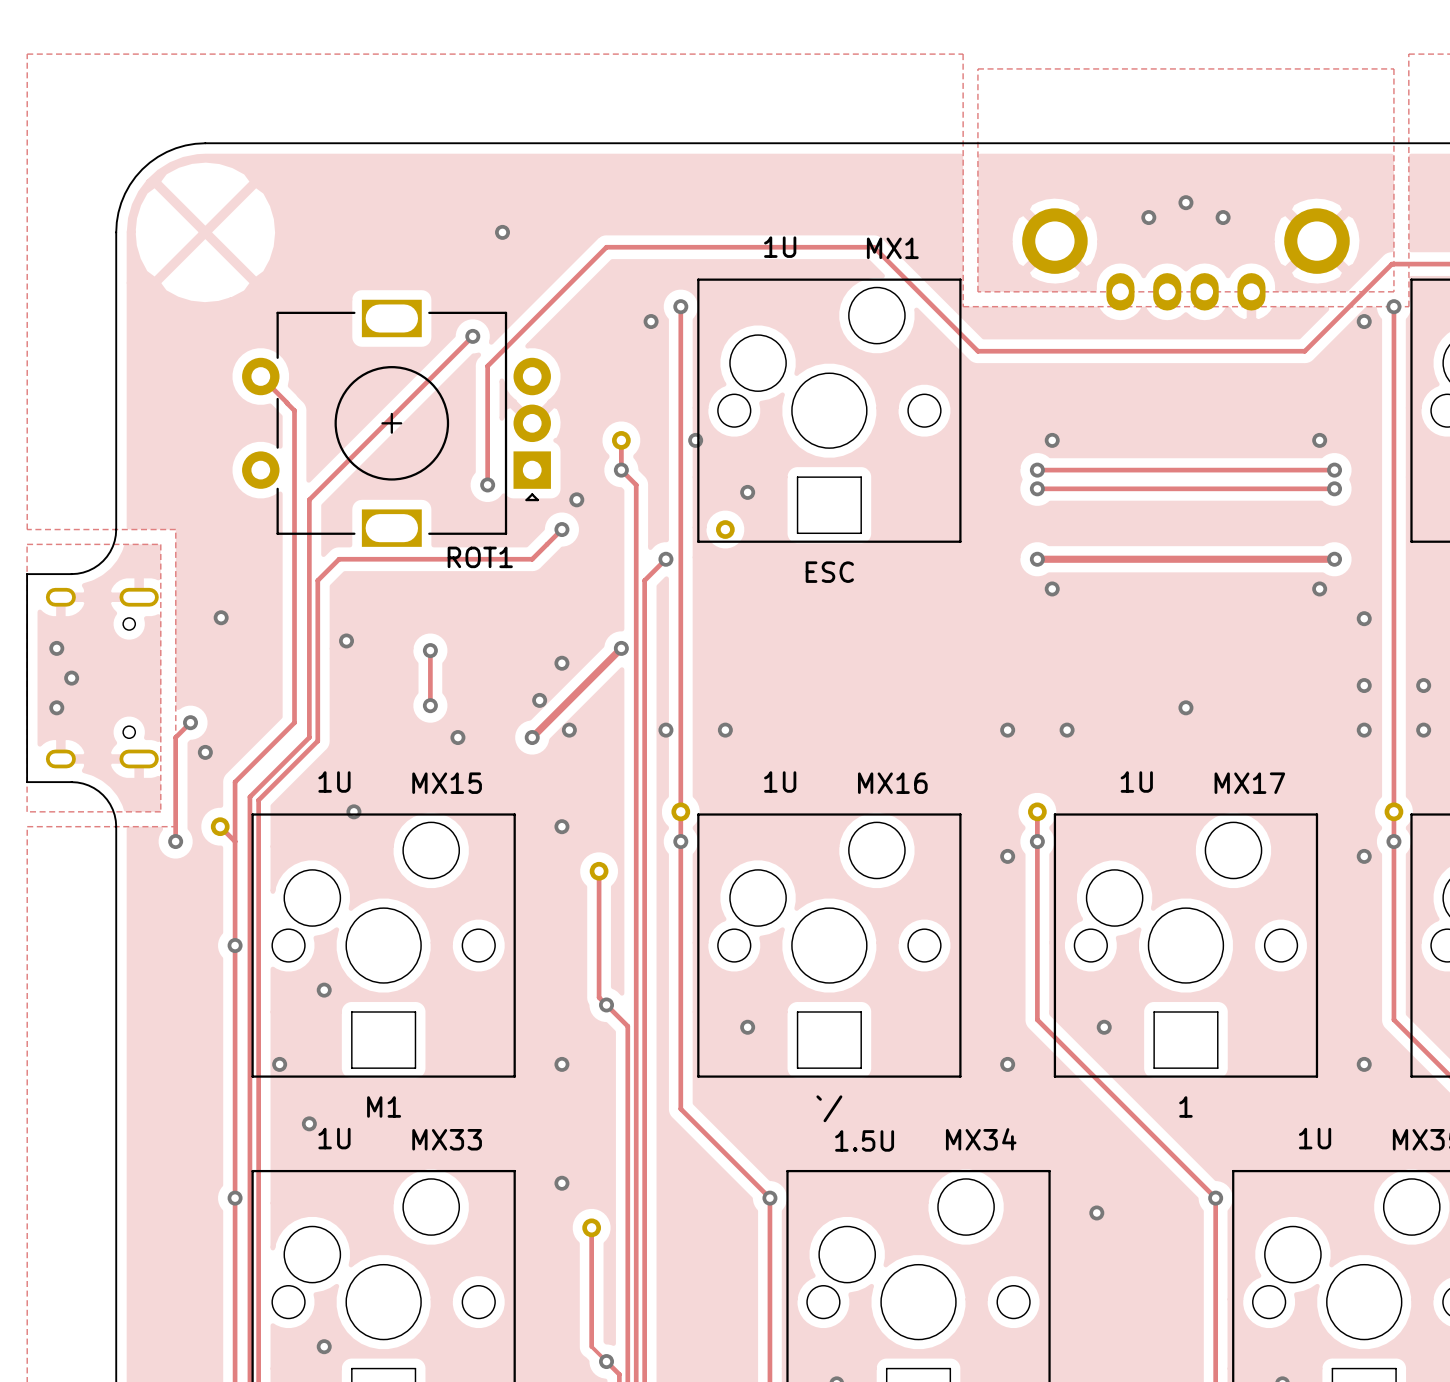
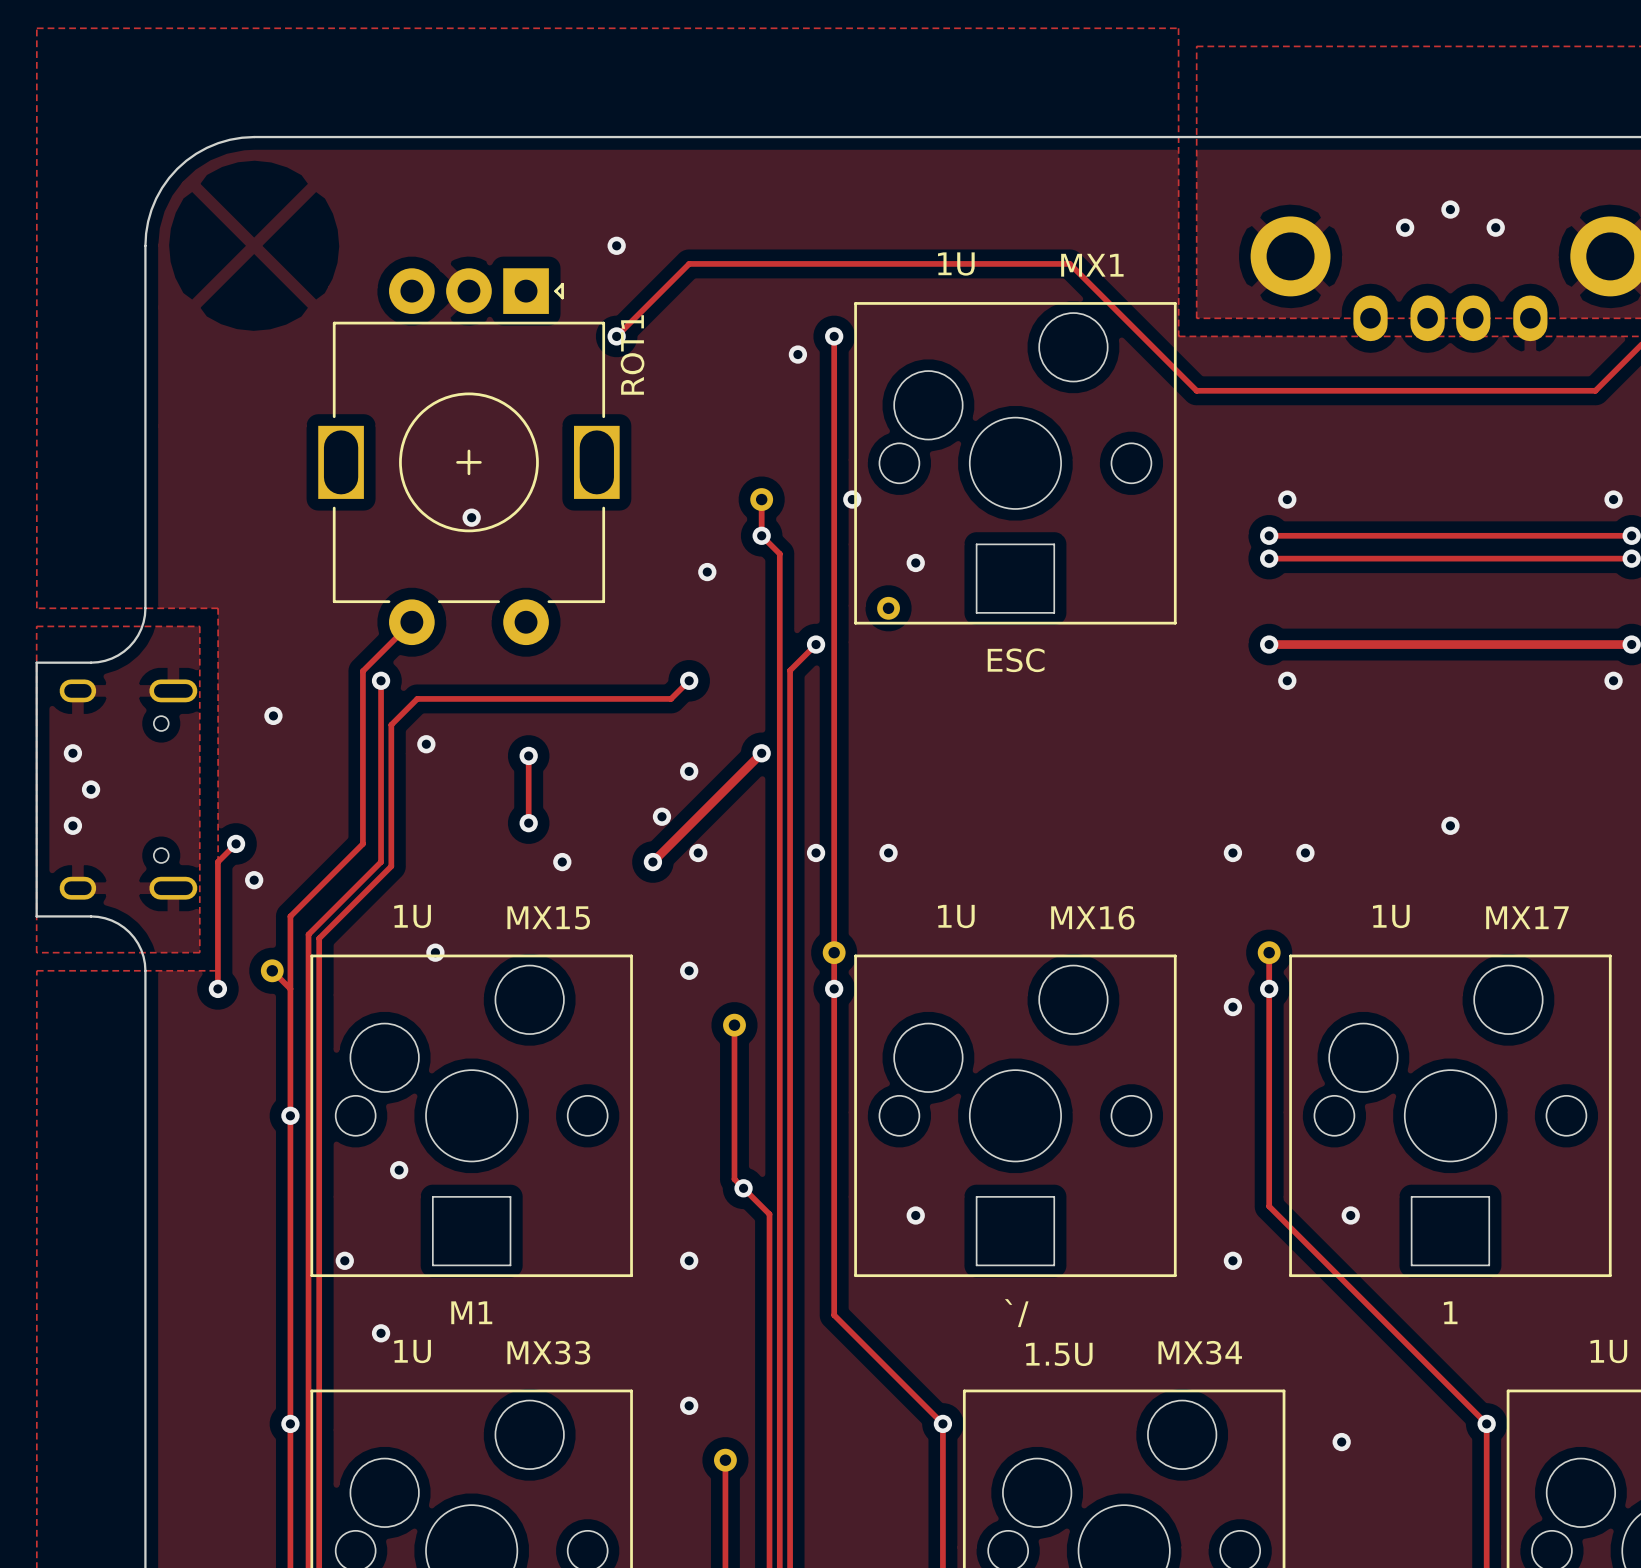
track: (606, 247) (487, 366) (487, 484) -> (743, 263) (689, 263) (616, 336)
track: (472, 336) (309, 499) (309, 588) -> none
via position: (472, 336) -> (616, 336)
track: (260, 376) (294, 410) (294, 581) -> (411, 622) (362, 671)
ROT1 rotation: 0° (396, 423) -> 90° counterclockwise (468, 456)
via: none -> (471, 517)
via: (487, 484) -> none
track: (561, 529) (532, 559) (339, 559) (317, 580) (317, 625) -> (689, 680) (671, 698) (417, 698) (391, 724)
via position: (561, 529) -> (689, 680)
via: none -> (381, 680)

